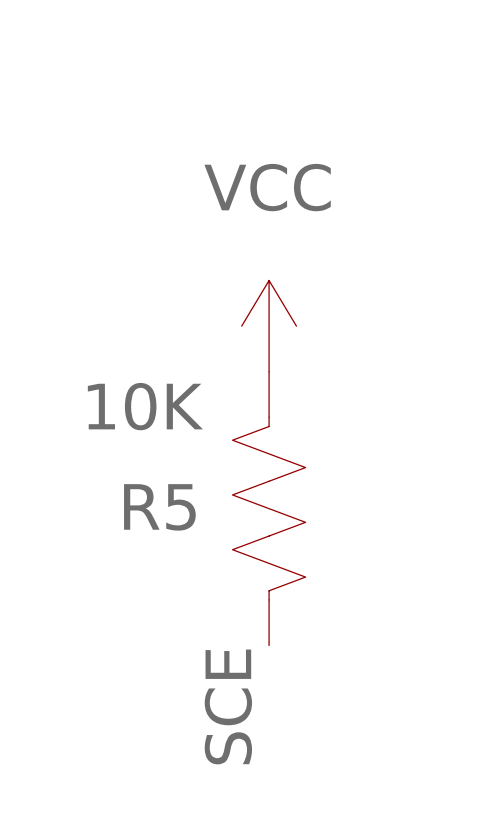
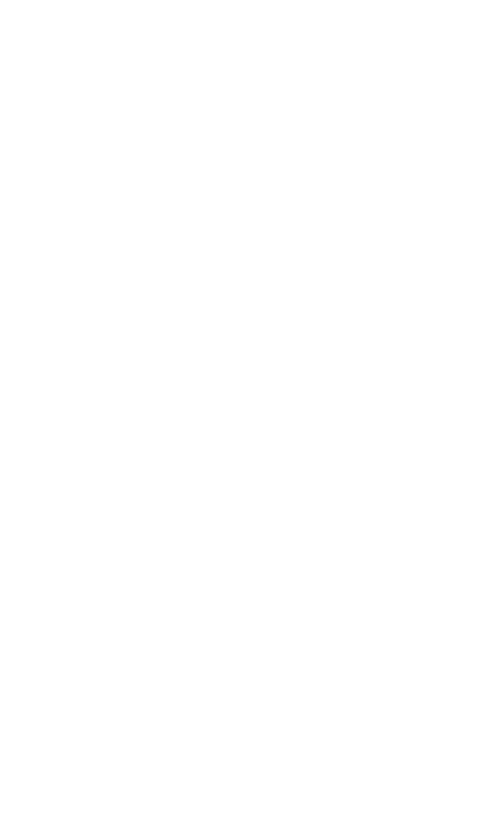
power symbol: VCC (269, 326) -> none
R5: 10K (269, 508) -> none
label: SCE (228, 706) -> none

